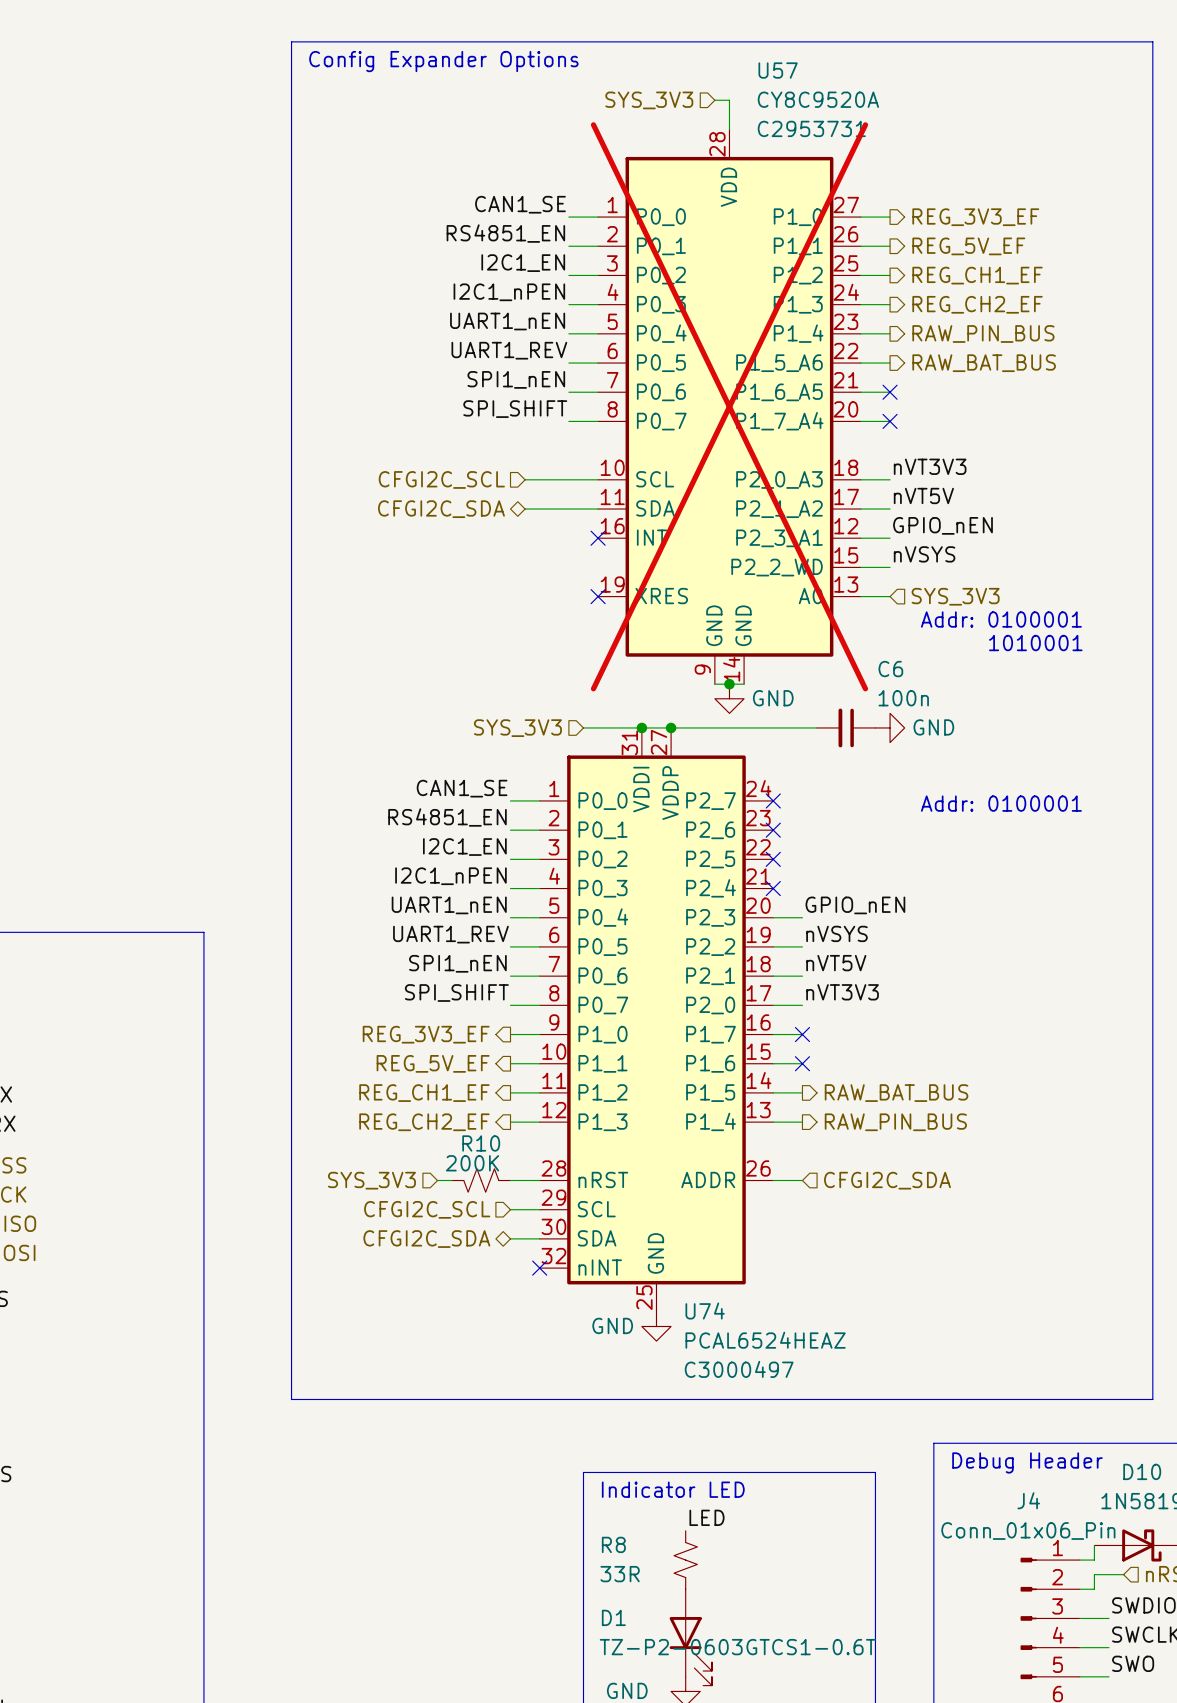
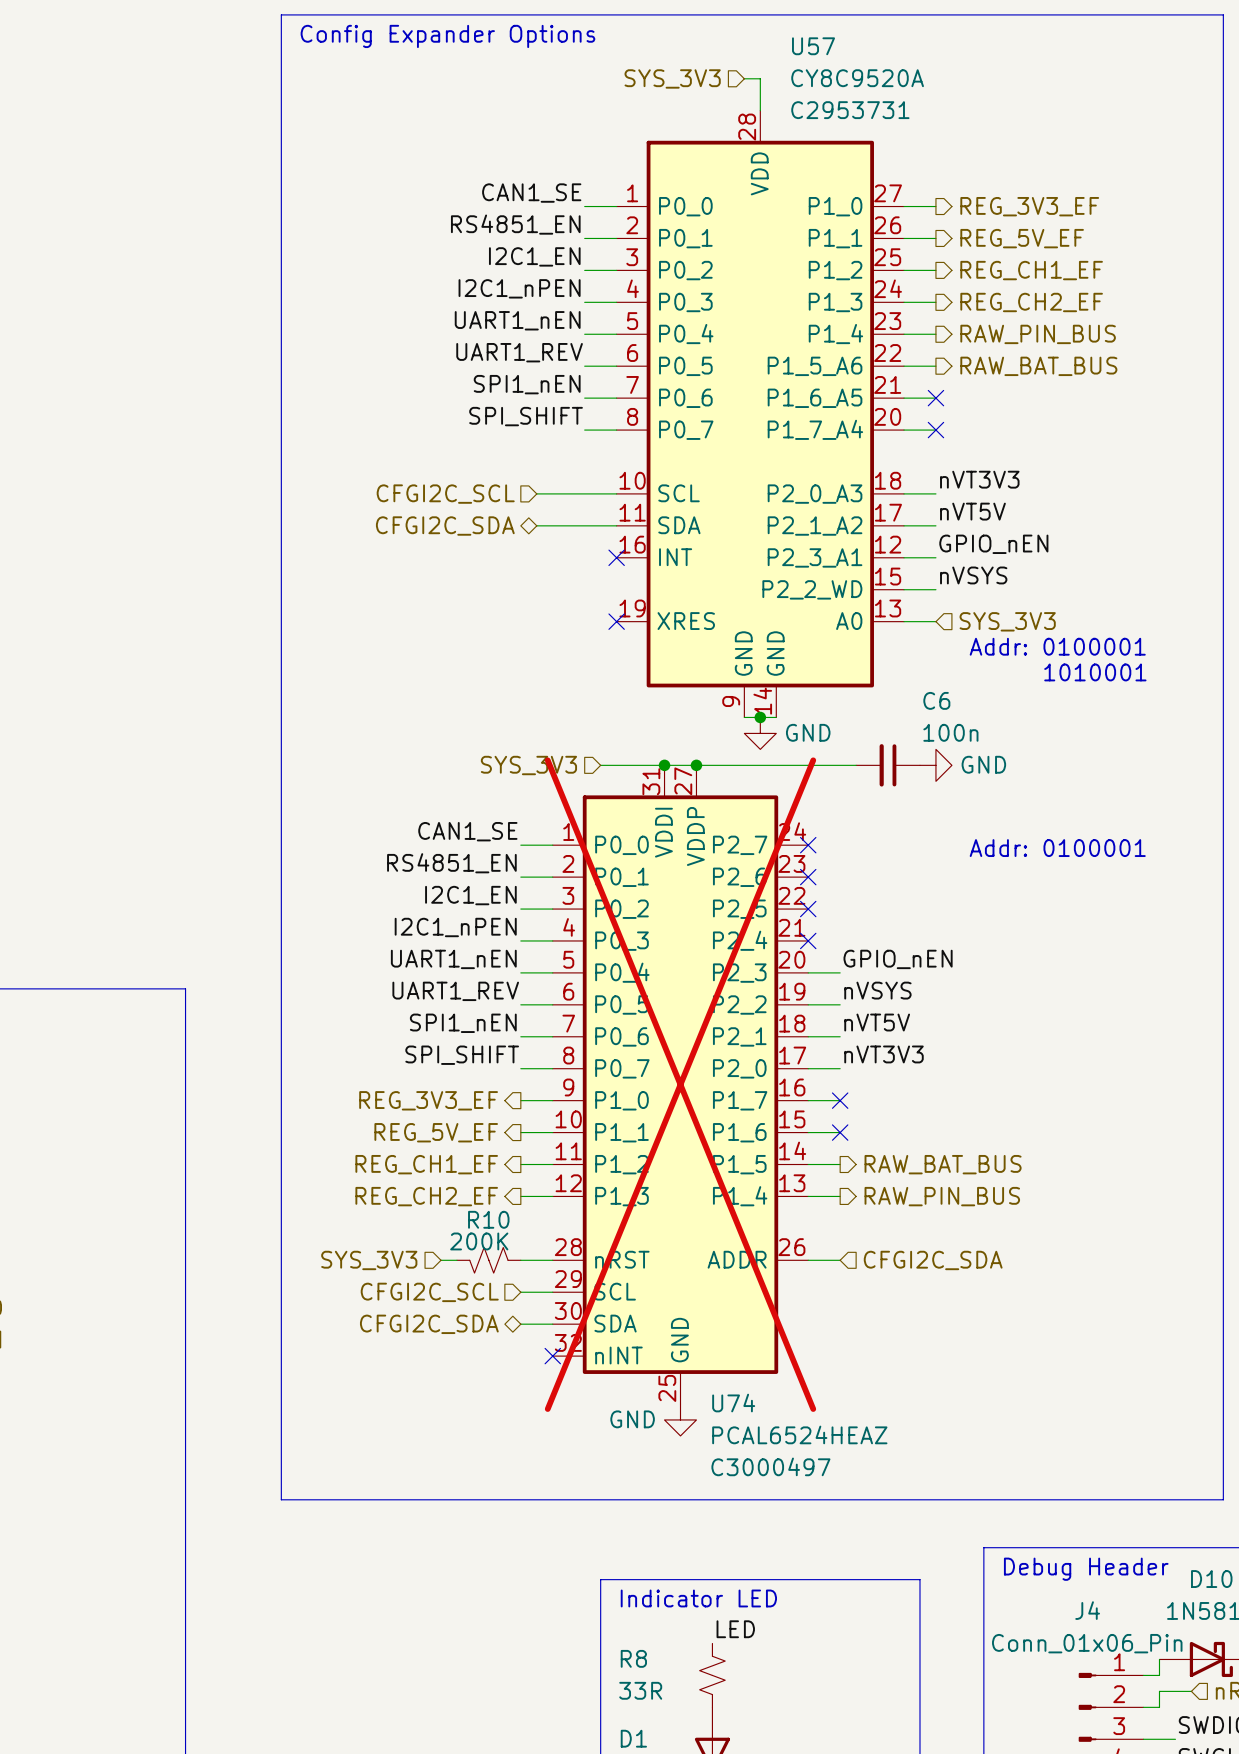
U57 do-not-place cross: (729, 406) -> none
U74 do-not-place cross: none -> (680, 1084)

